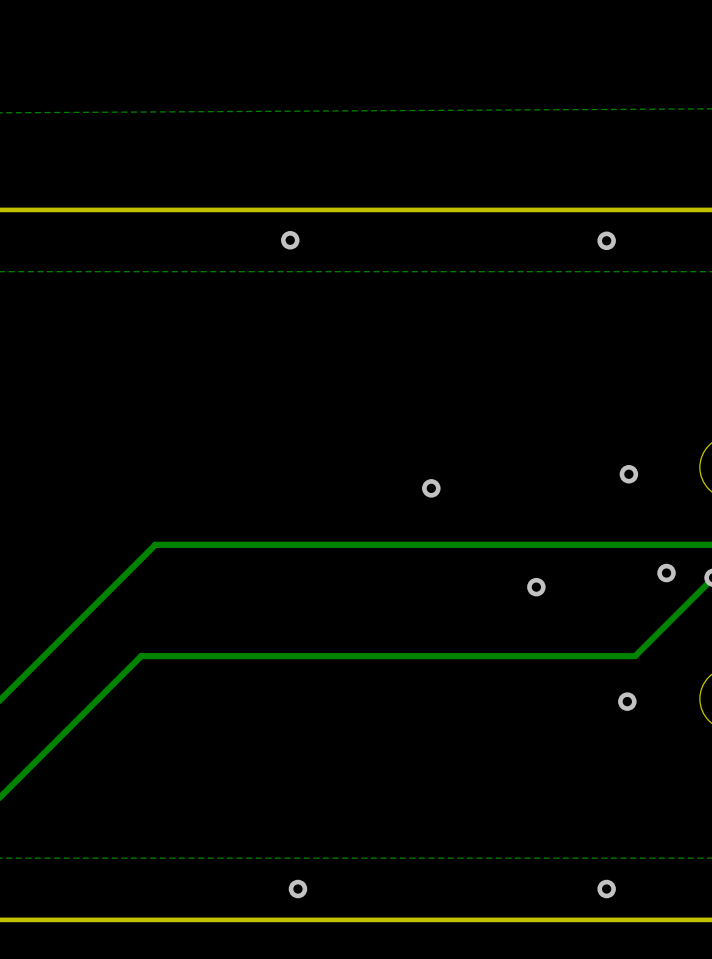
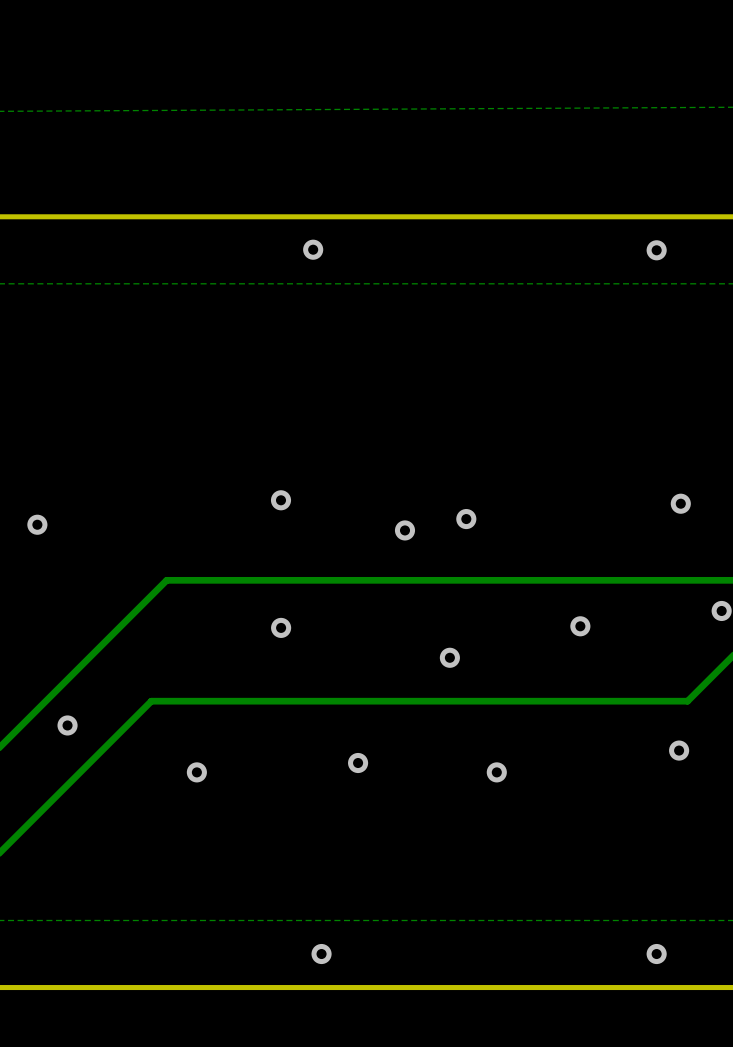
via: none -> (281, 500)
via: none -> (37, 524)
via: none -> (404, 530)
via: none -> (281, 627)
via: none -> (449, 657)
via: none -> (67, 725)
via: none -> (358, 763)
via: none -> (196, 772)
via: none -> (496, 772)

